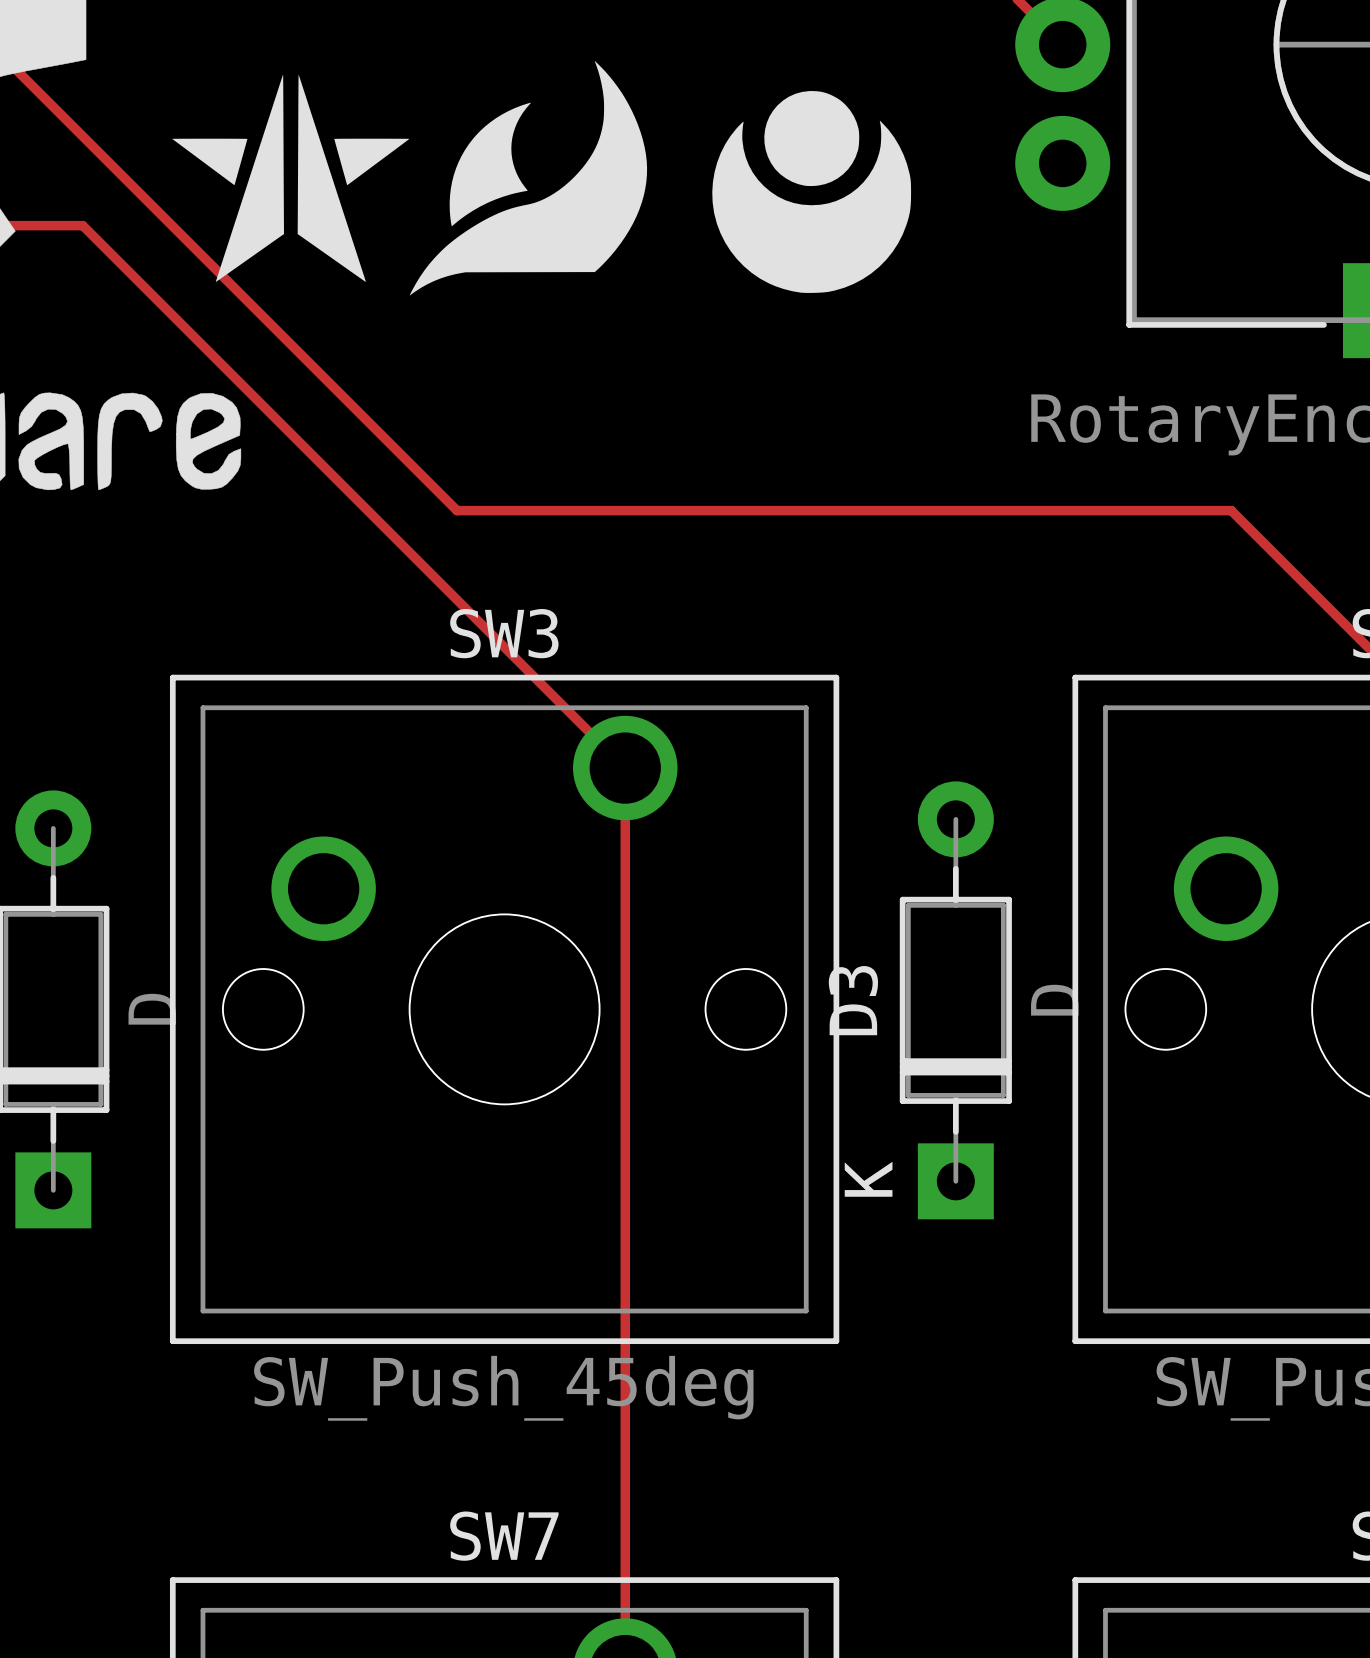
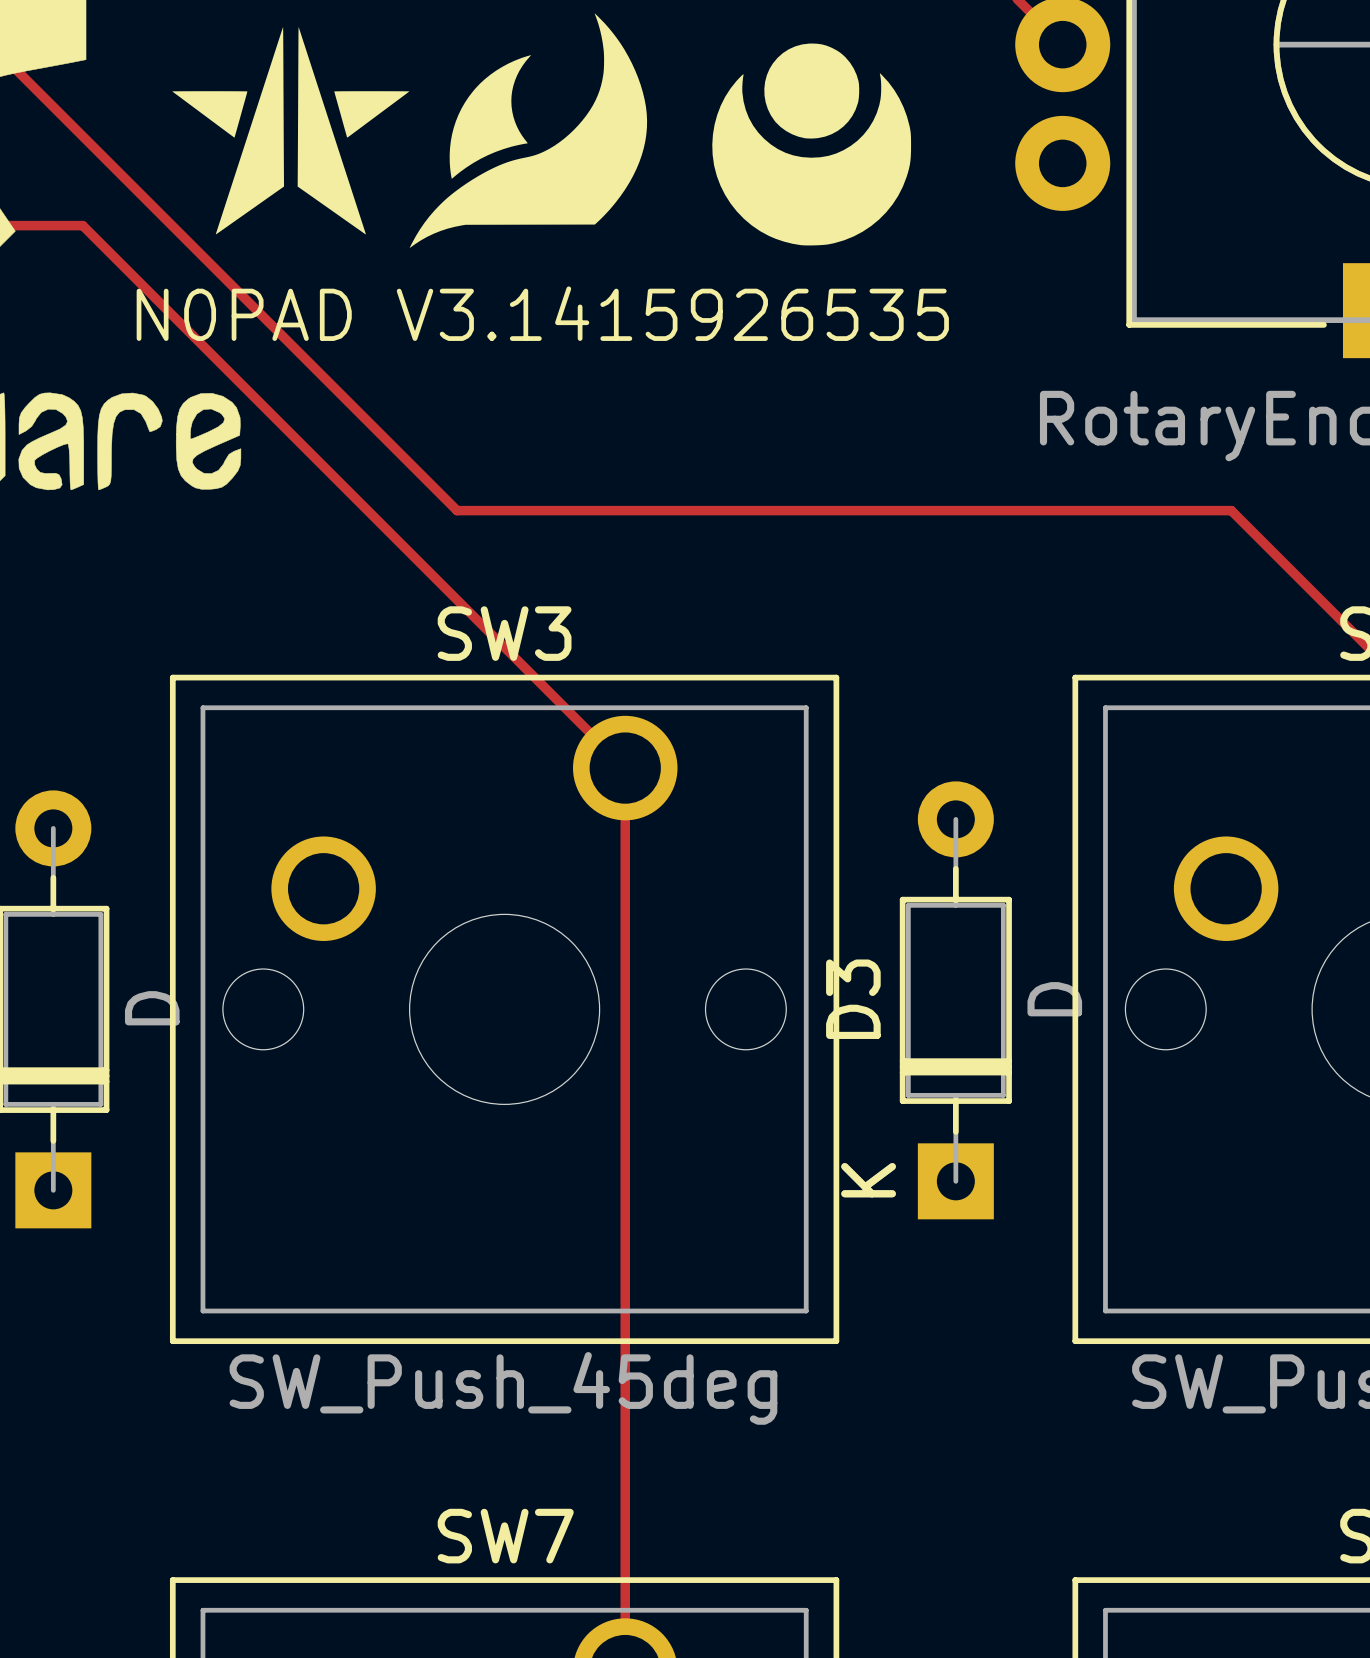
drawing position: (290, 178) -> (290, 130)
drawing position: (528, 178) -> (528, 130)
drawing position: (811, 191) -> (811, 144)
text: none -> N0PAD V3.1415926535 (542, 313)

